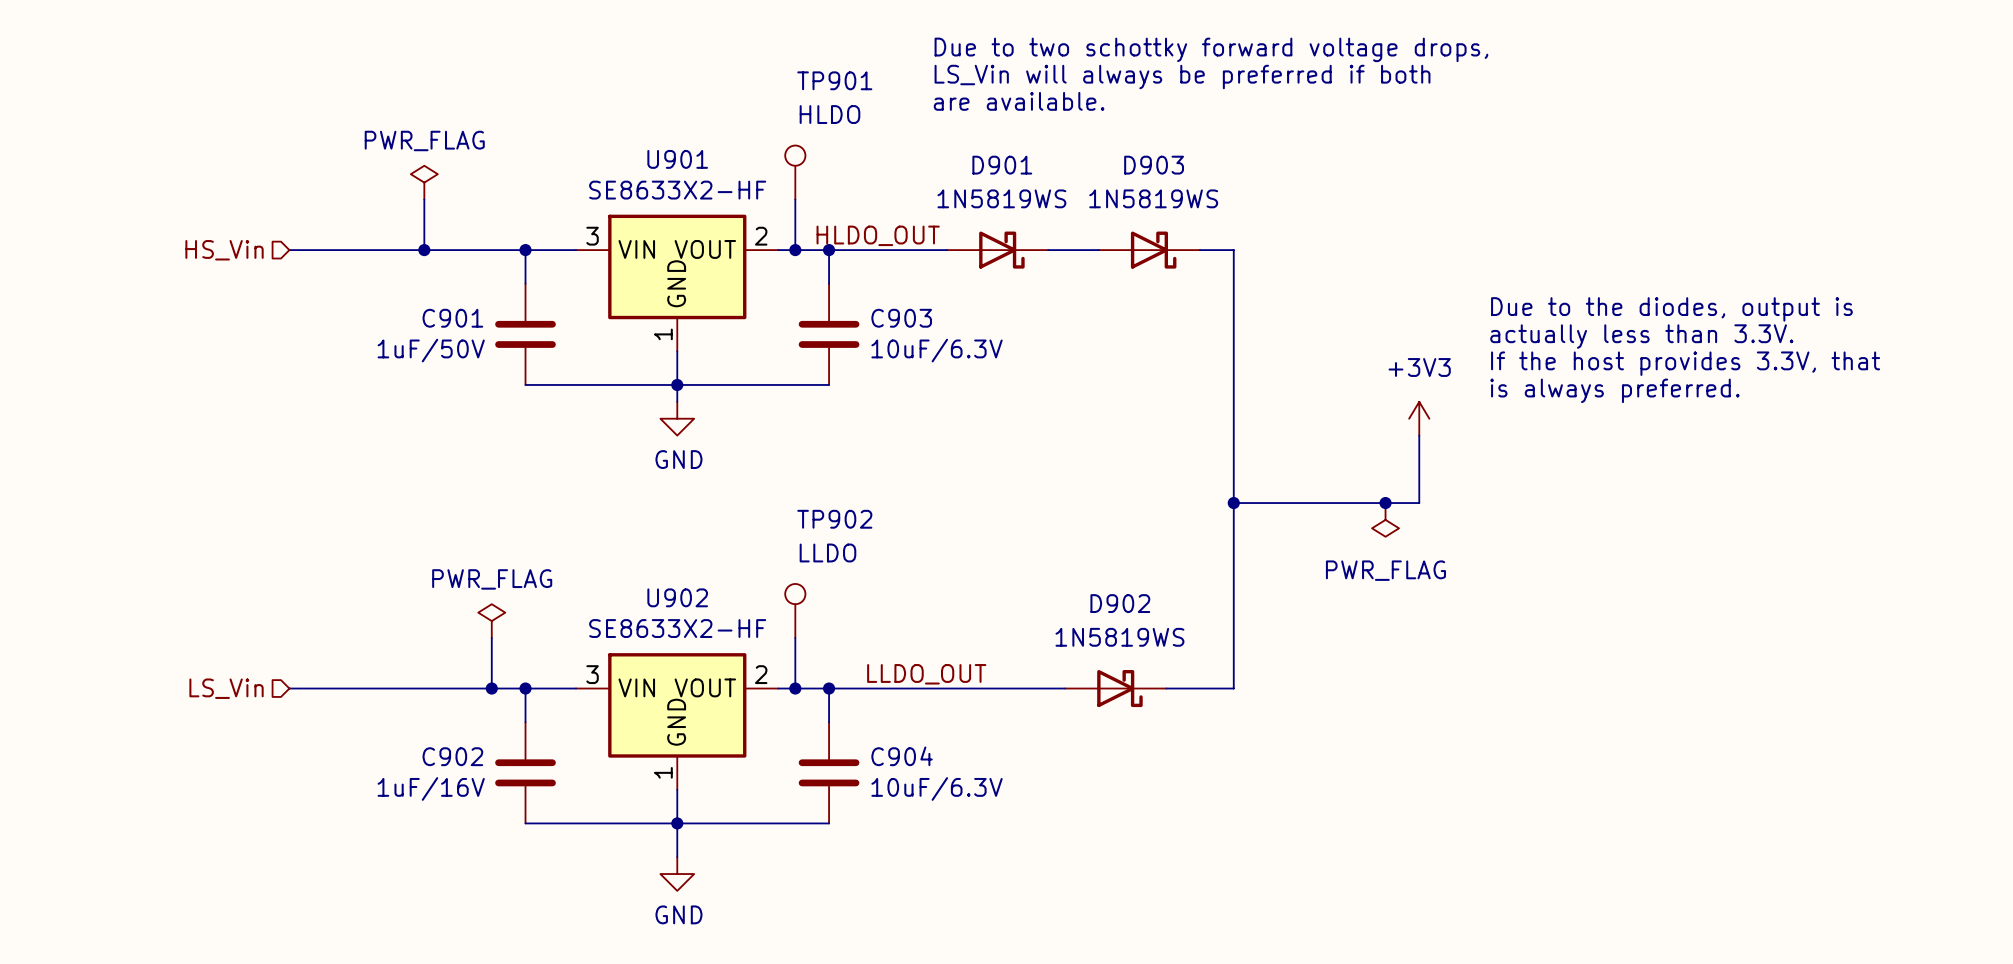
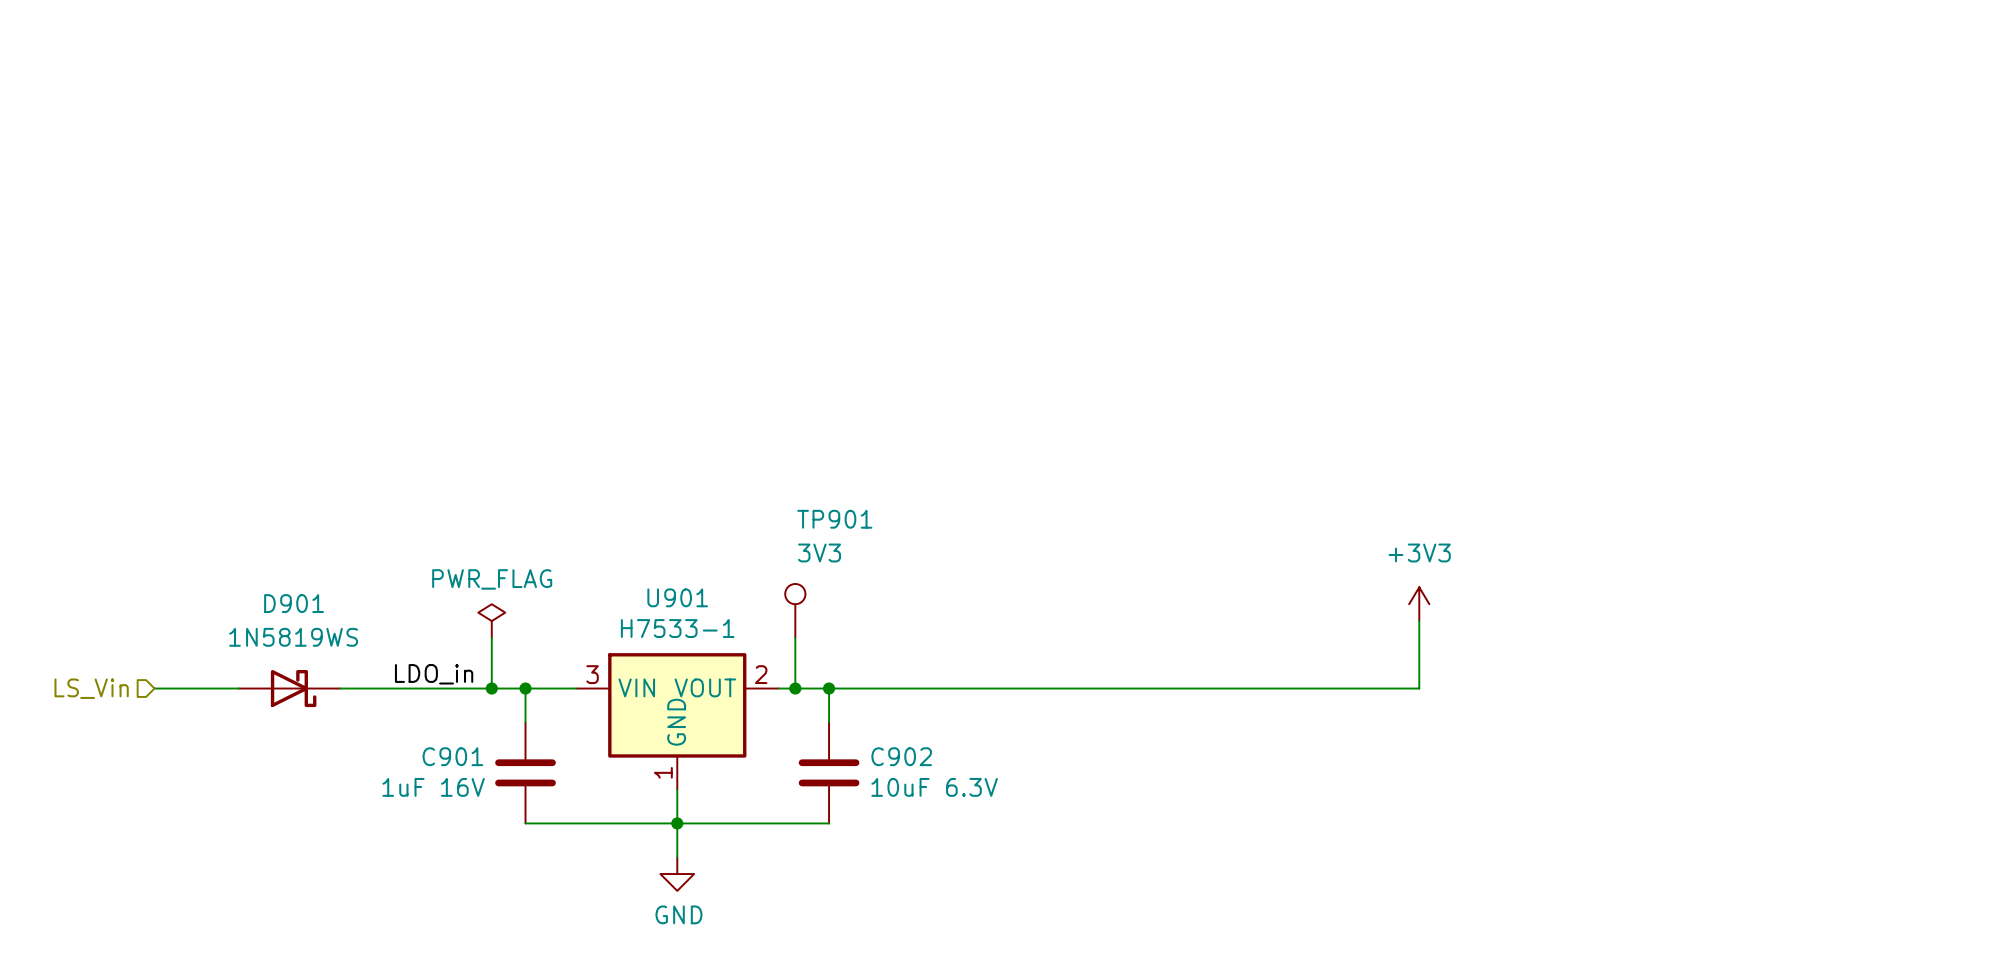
text: Due to two schottky forward voltage drops, (1211, 49) -> none
text: LS_Vin will always be preferred if both (1182, 77) -> none
text: are available. (1019, 101) -> none
TP901: HLDO (795, 172) -> none
power symbol: PWR_FLAG (424, 182) -> none
wire: (424, 199) (424, 250) -> none
wire: (795, 199) (795, 250) -> none
label: HLDO_OUT (878, 235) -> none
hierarchical label: HS_Vin (224, 250) -> none
wire: (289, 250) (576, 250) -> none
junction: (424, 250) -> none
wire: (525, 250) (525, 283) -> none
junction: (525, 250) -> none
wire: (778, 250) (947, 250) -> none
junction: (795, 250) -> none
wire: (829, 250) (829, 283) -> none
junction: (829, 250) -> none
D901 position: (997, 250) -> (289, 688)
wire: (1048, 250) (1098, 250) -> none
D903: 1N5819WS (1149, 250) -> none
wire: (1200, 250) (1233, 250) (1233, 688) -> (1419, 621) (1419, 688) (1233, 688)
U901: SE8633X2-HF (677, 282) -> none
text: Due to the diodes, output is (1671, 309) -> none
C901: 1uF/50V (525, 334) -> none
C903: 10uF/6.3V (829, 334) -> none
text: actually less than 3.3V. (1641, 336) -> none
wire: (677, 351) (677, 401) -> none
text: If the host provides 3.3V, that (1685, 363) -> none
wire: (525, 384) (829, 384) -> none
junction: (677, 384) -> none
text: is always preferred. (1614, 390) -> none
power symbol: GND (677, 418) -> none
power symbol position: +3V3 (1419, 418) -> +3V3 (1419, 604)
wire: (1419, 435) (1419, 503) (1233, 503) -> none
junction: (1233, 503) -> none
junction: (1385, 503) -> none
TP902 name: TP902 (834, 519) -> TP901 (834, 519)
power symbol: PWR_FLAG (1385, 519) -> none
TP902 value: LLDO (827, 552) -> 3V3 (819, 552)
U902 name: U902 (677, 597) -> U901 (677, 597)
U902 value: SE8633X2-HF (677, 628) -> H7533-1 (677, 628)
label: none -> LDO_in (434, 674)
label: LLDO_OUT (926, 674) -> none
wire: none -> (154, 688) (238, 688)
hierarchical label position: LS_Vin (226, 688) -> LS_Vin (91, 688)
D902: 1N5819WS (1115, 688) -> none
C902 name: C902 (452, 756) -> C901 (452, 756)
C904 name: C904 (902, 756) -> C902 (901, 756)
C902 value: 1uF/16V (431, 788) -> 1uF 16V (433, 787)
C904 value: 10uF/6.3V (937, 788) -> 10uF 6.3V (934, 787)

